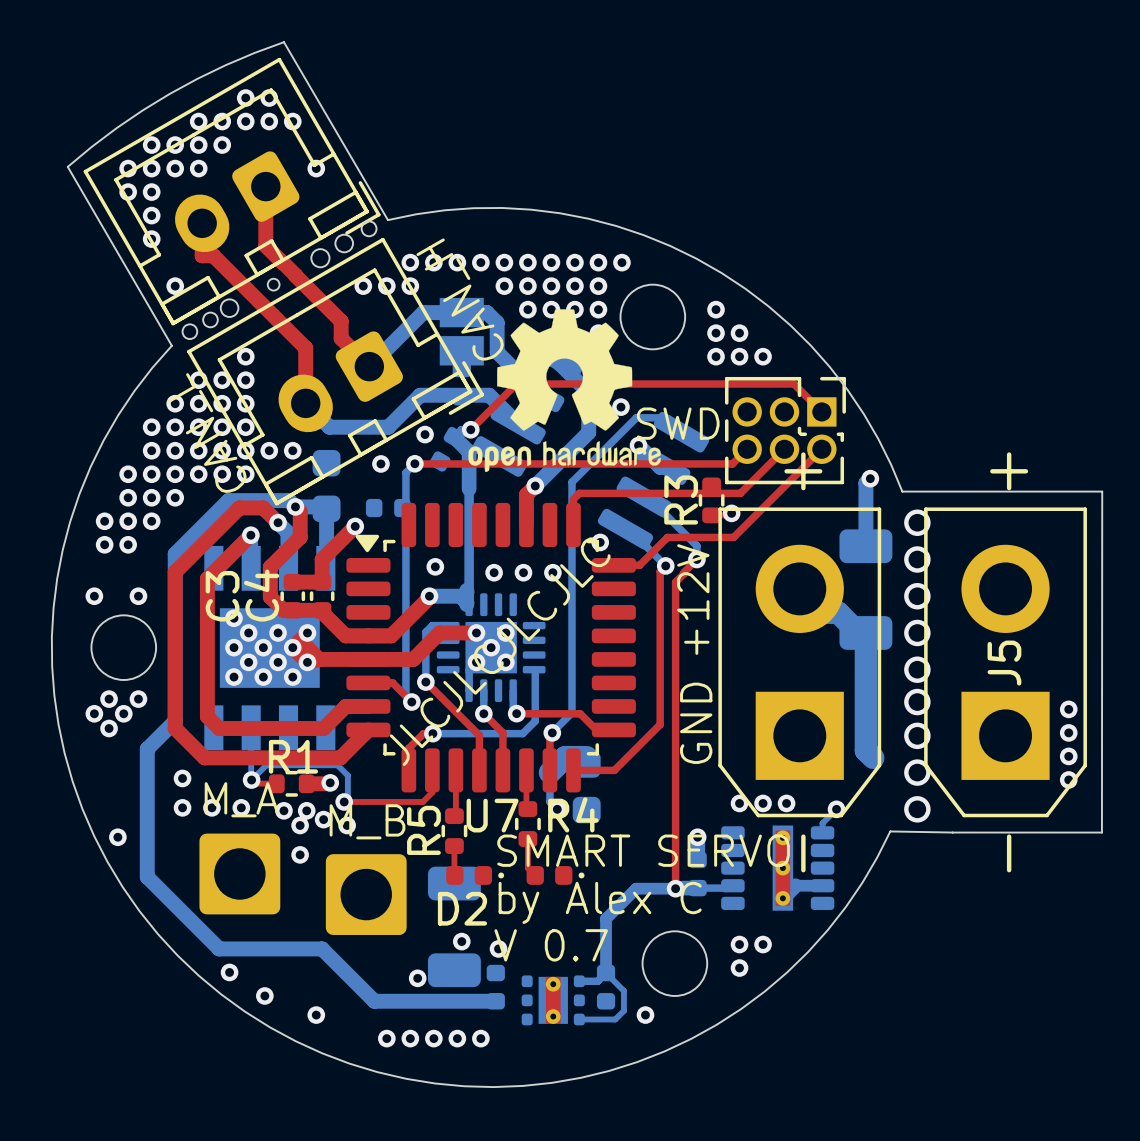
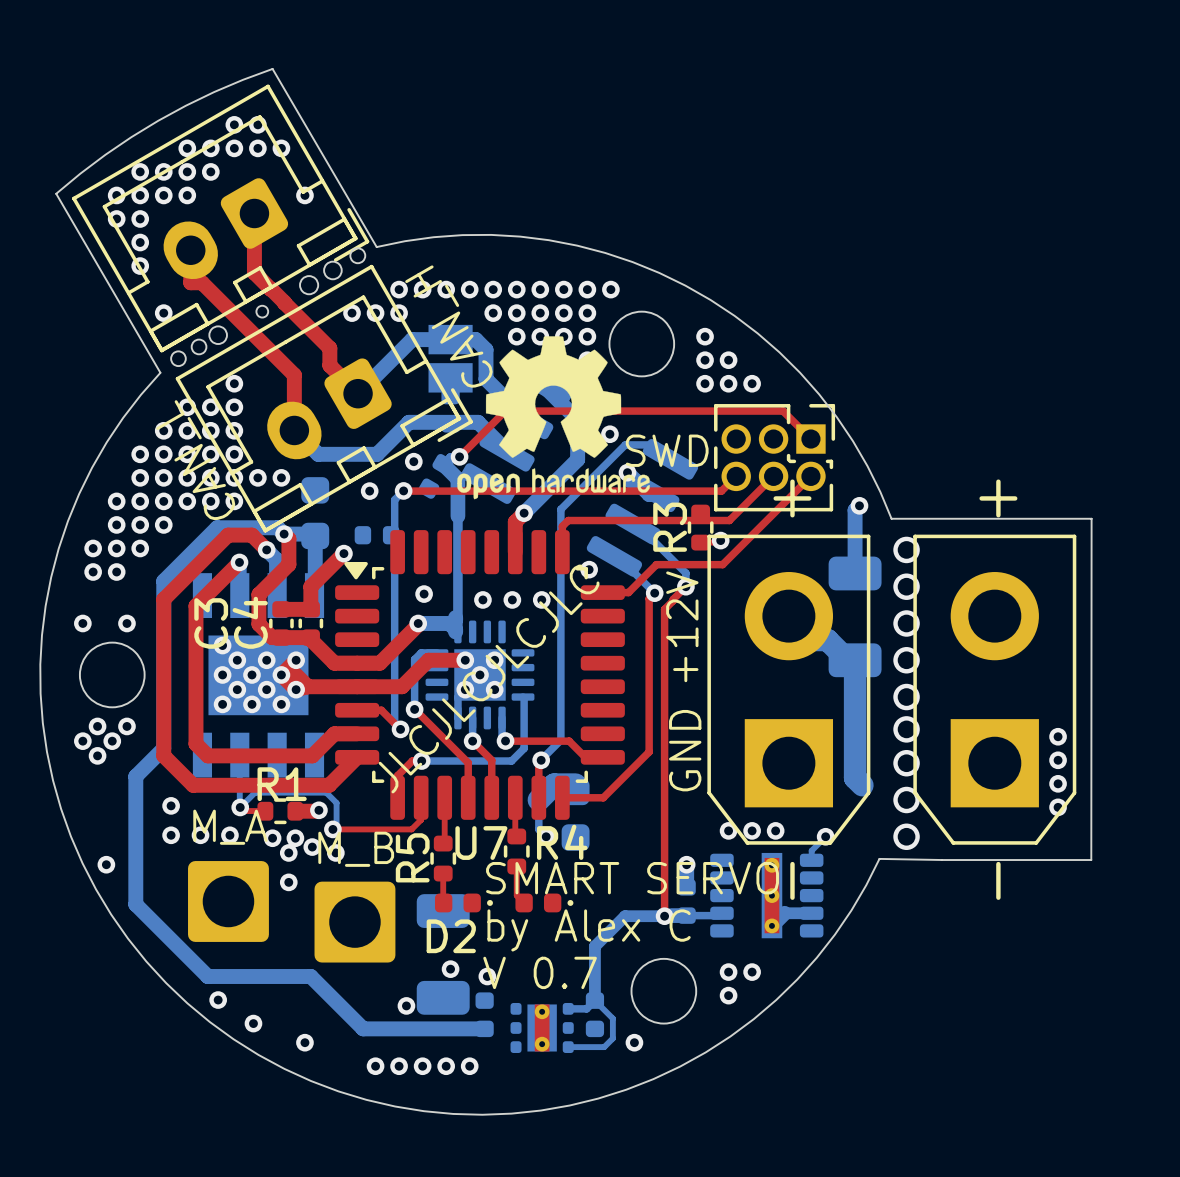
J5 name: J5 (1004, 663) -> none

